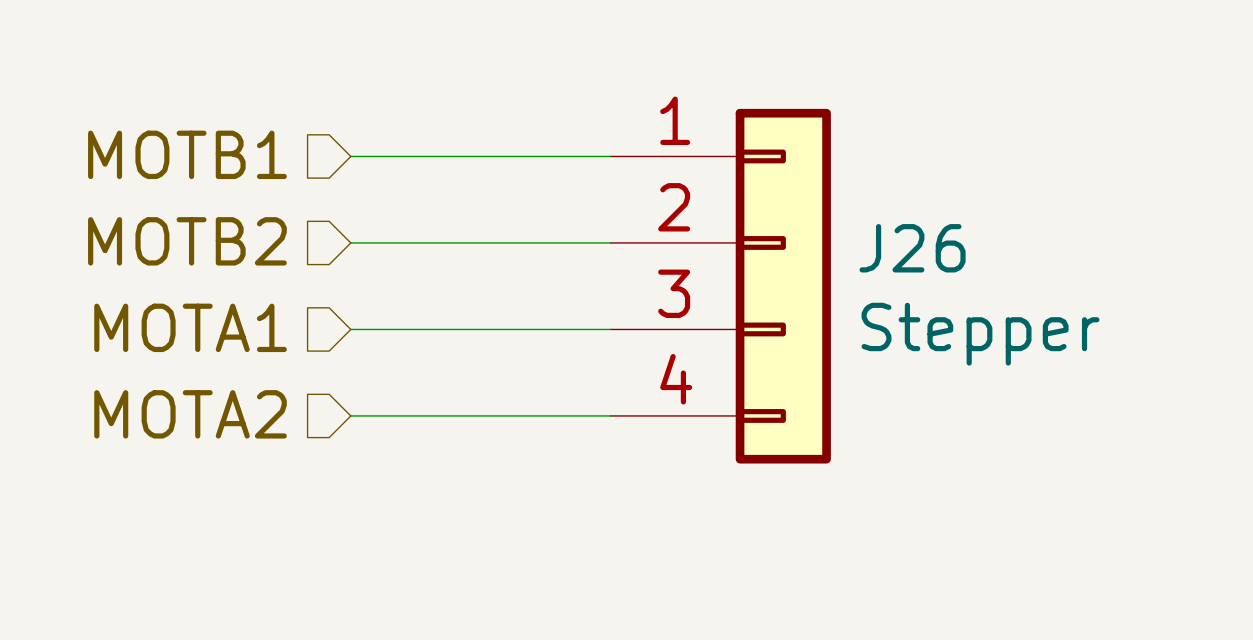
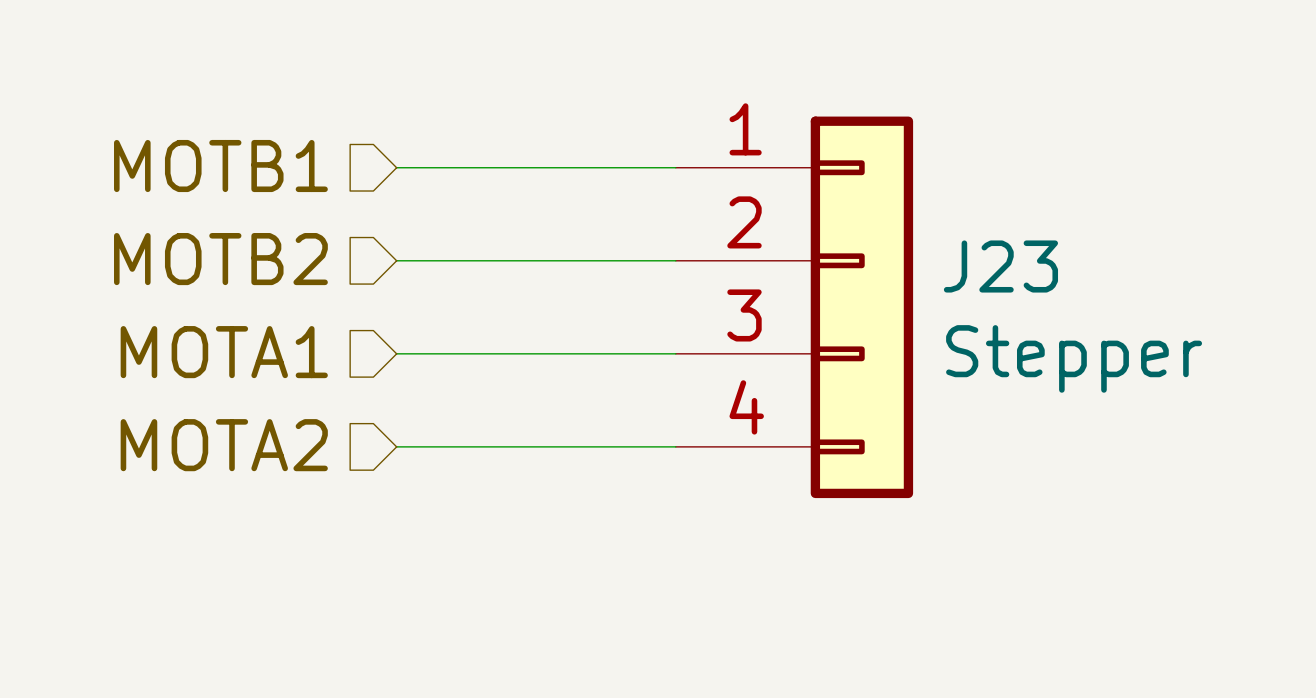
J26 name: J26 (912, 248) -> J23 (1000, 266)

